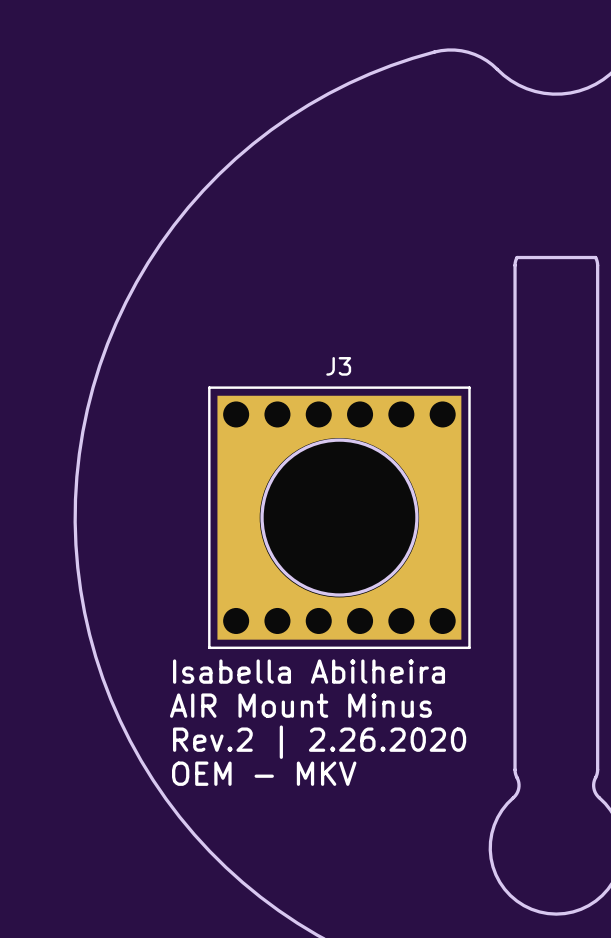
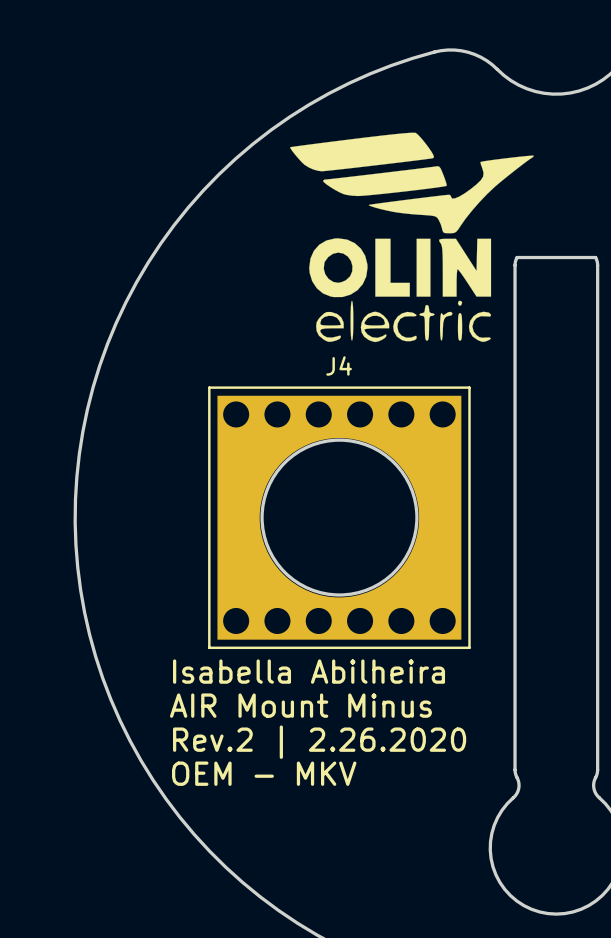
drawing: none -> [290, 132, 534, 343]
J3 name: J3 (338, 366) -> J4 (339, 365)

